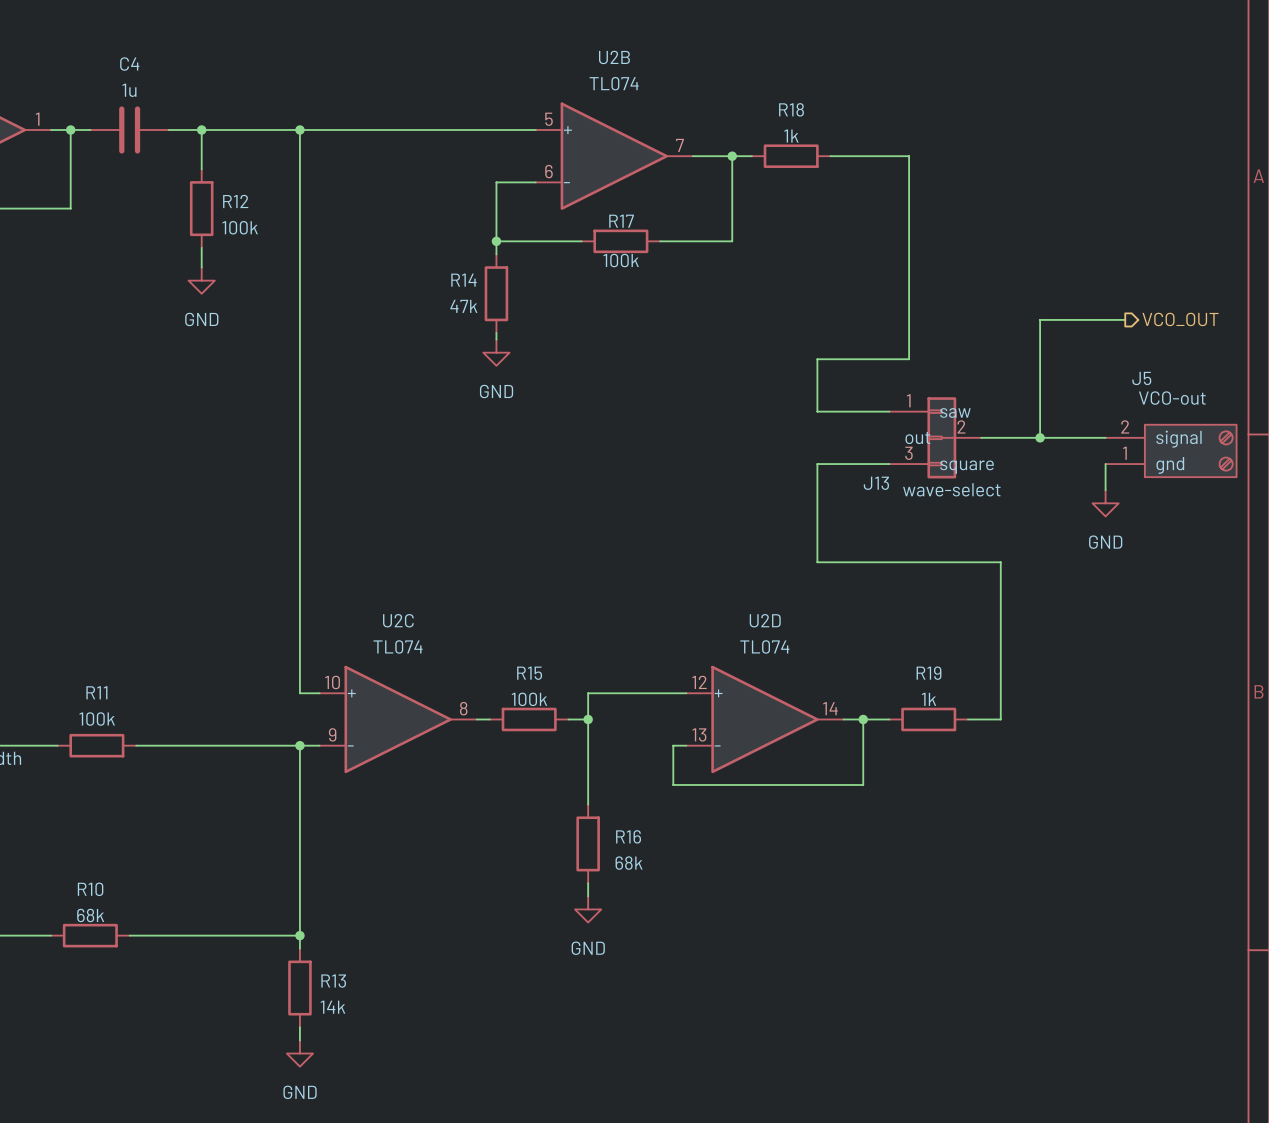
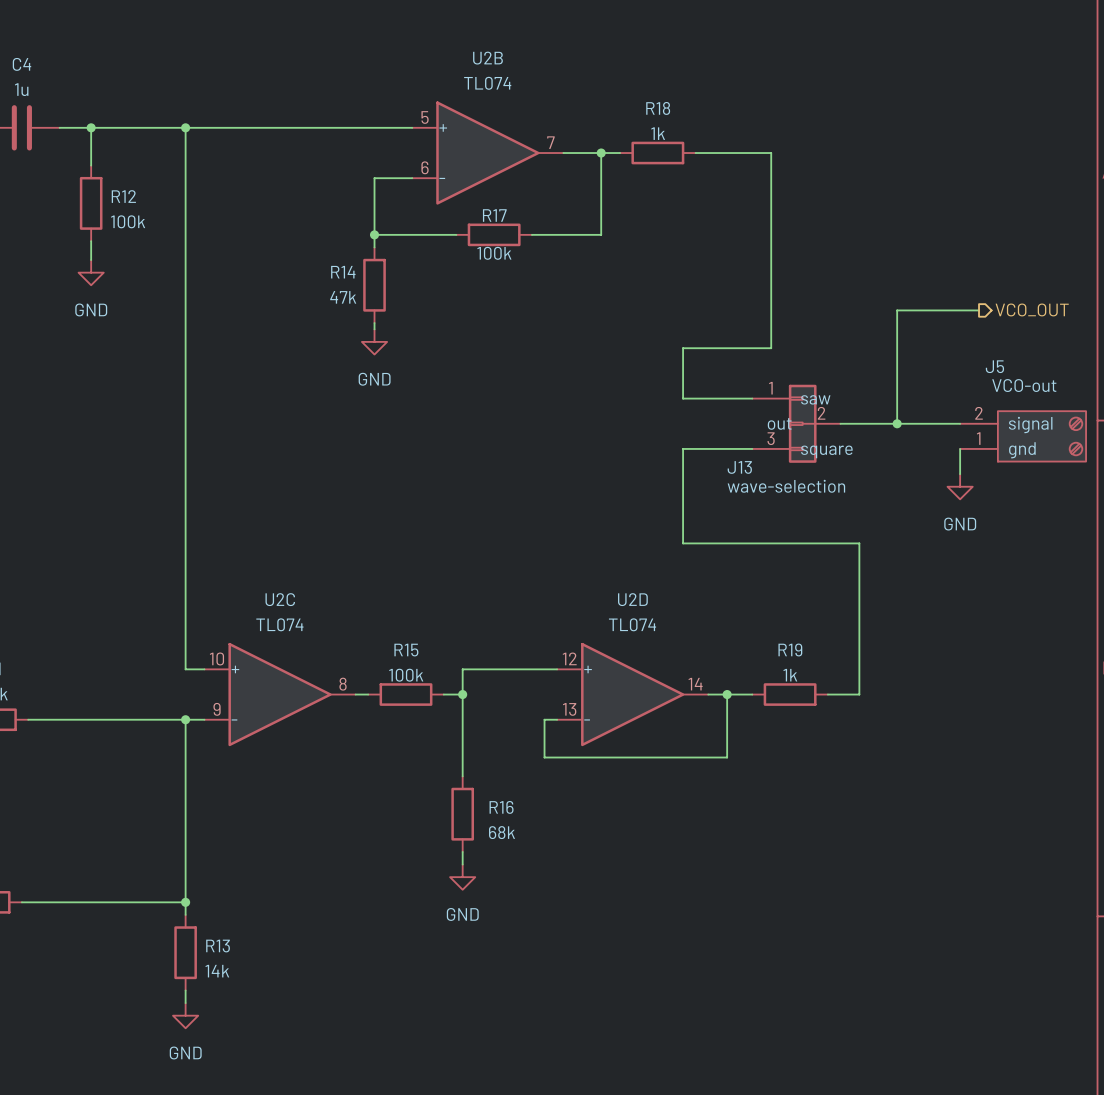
J13 value: wave-select (951, 489) -> wave-selection (786, 486)

